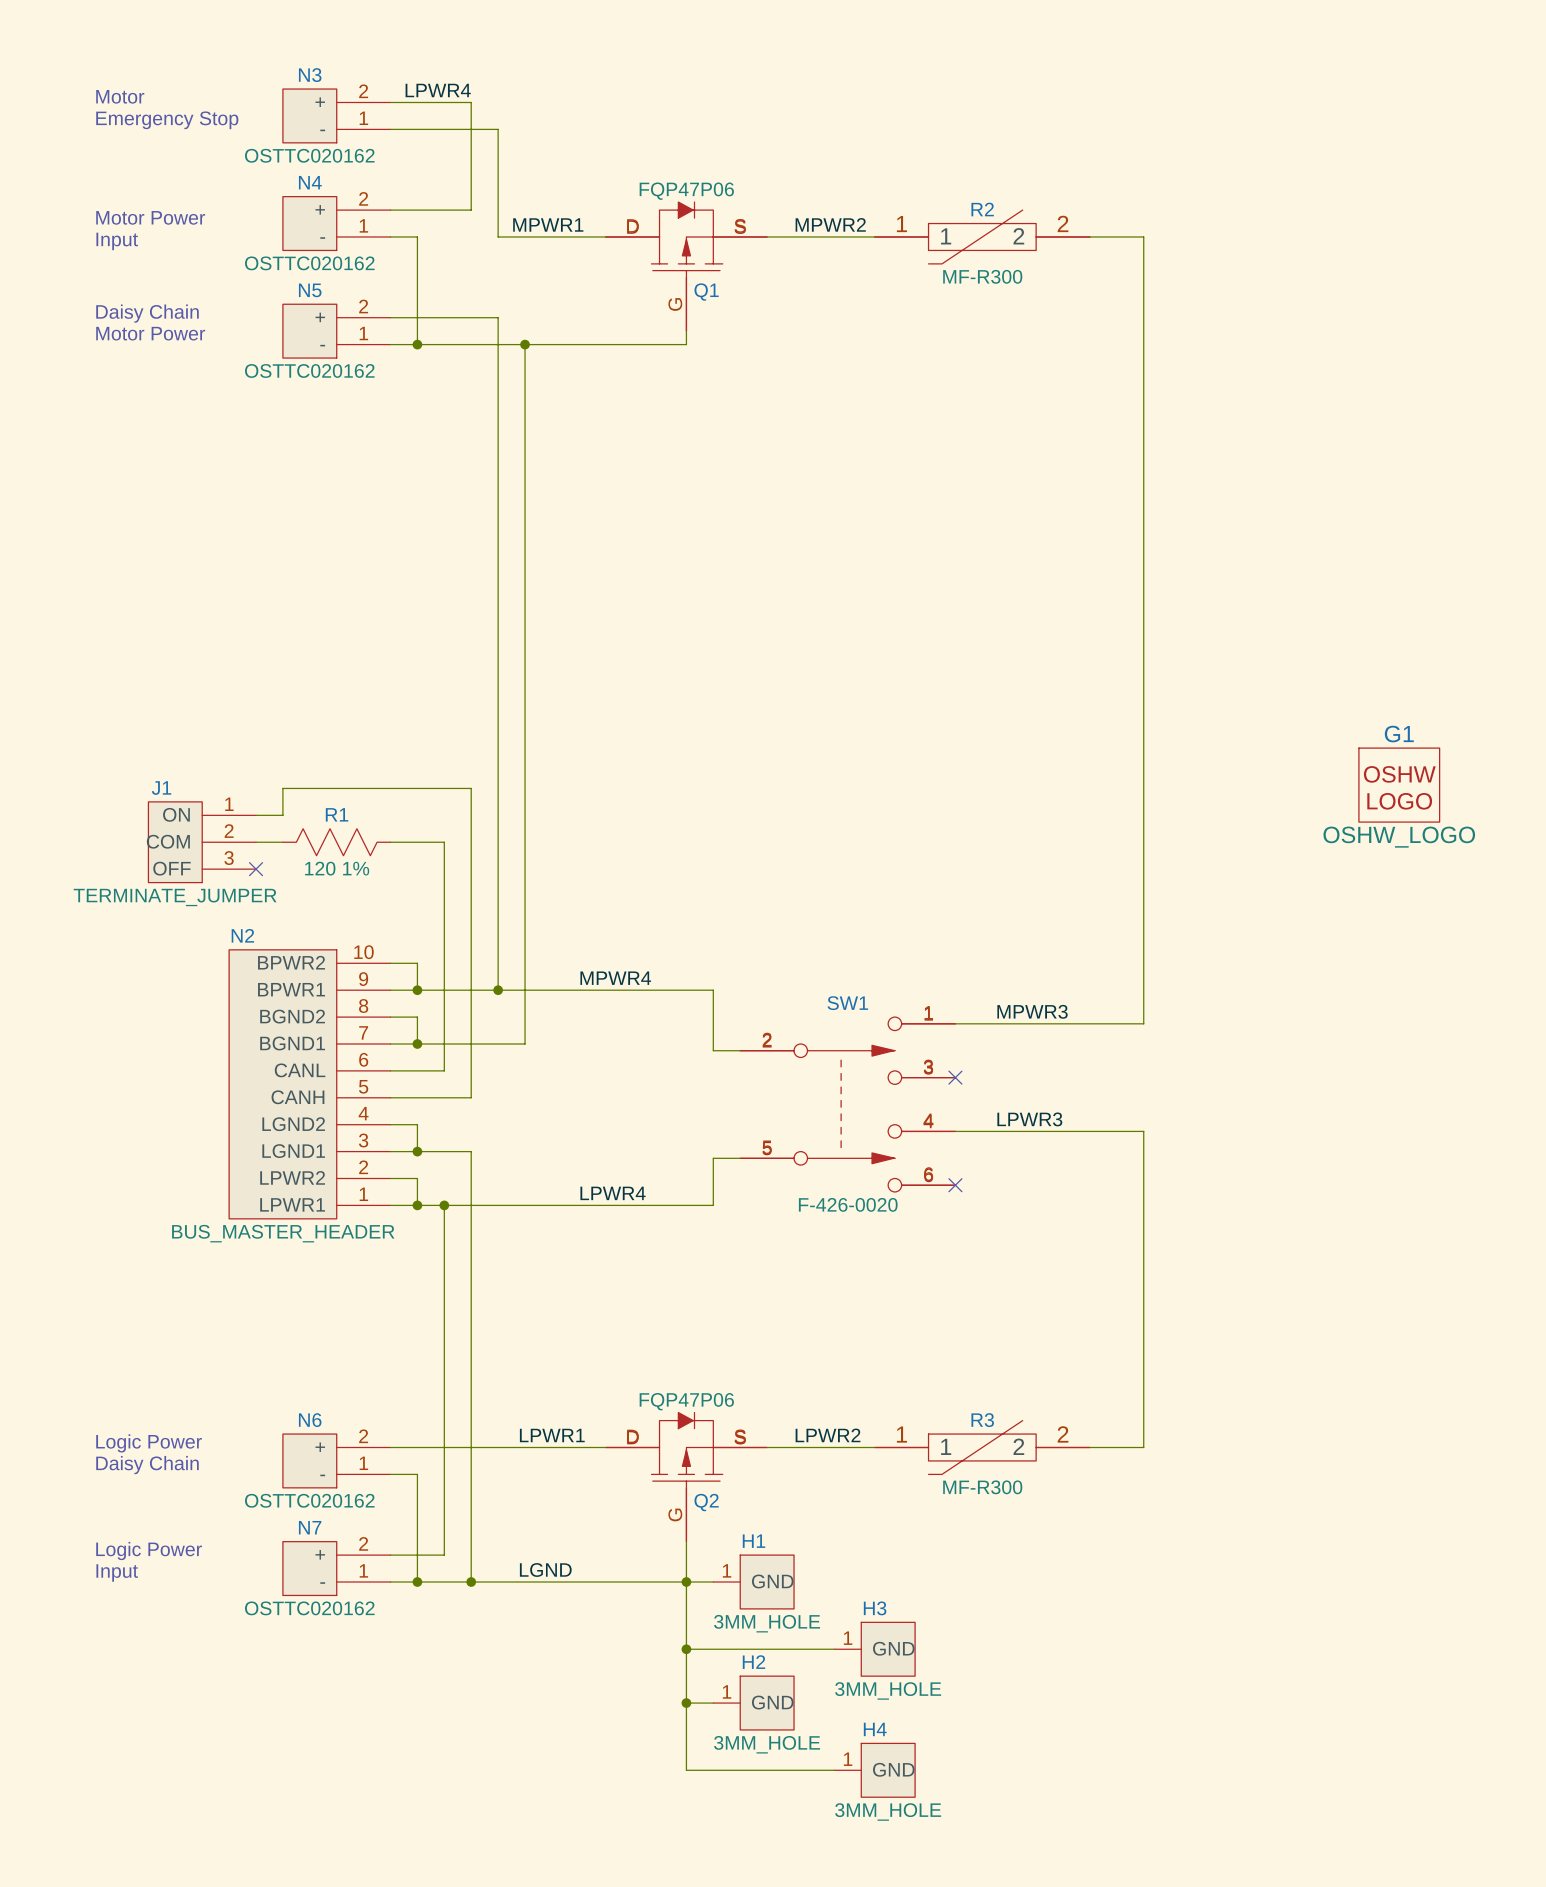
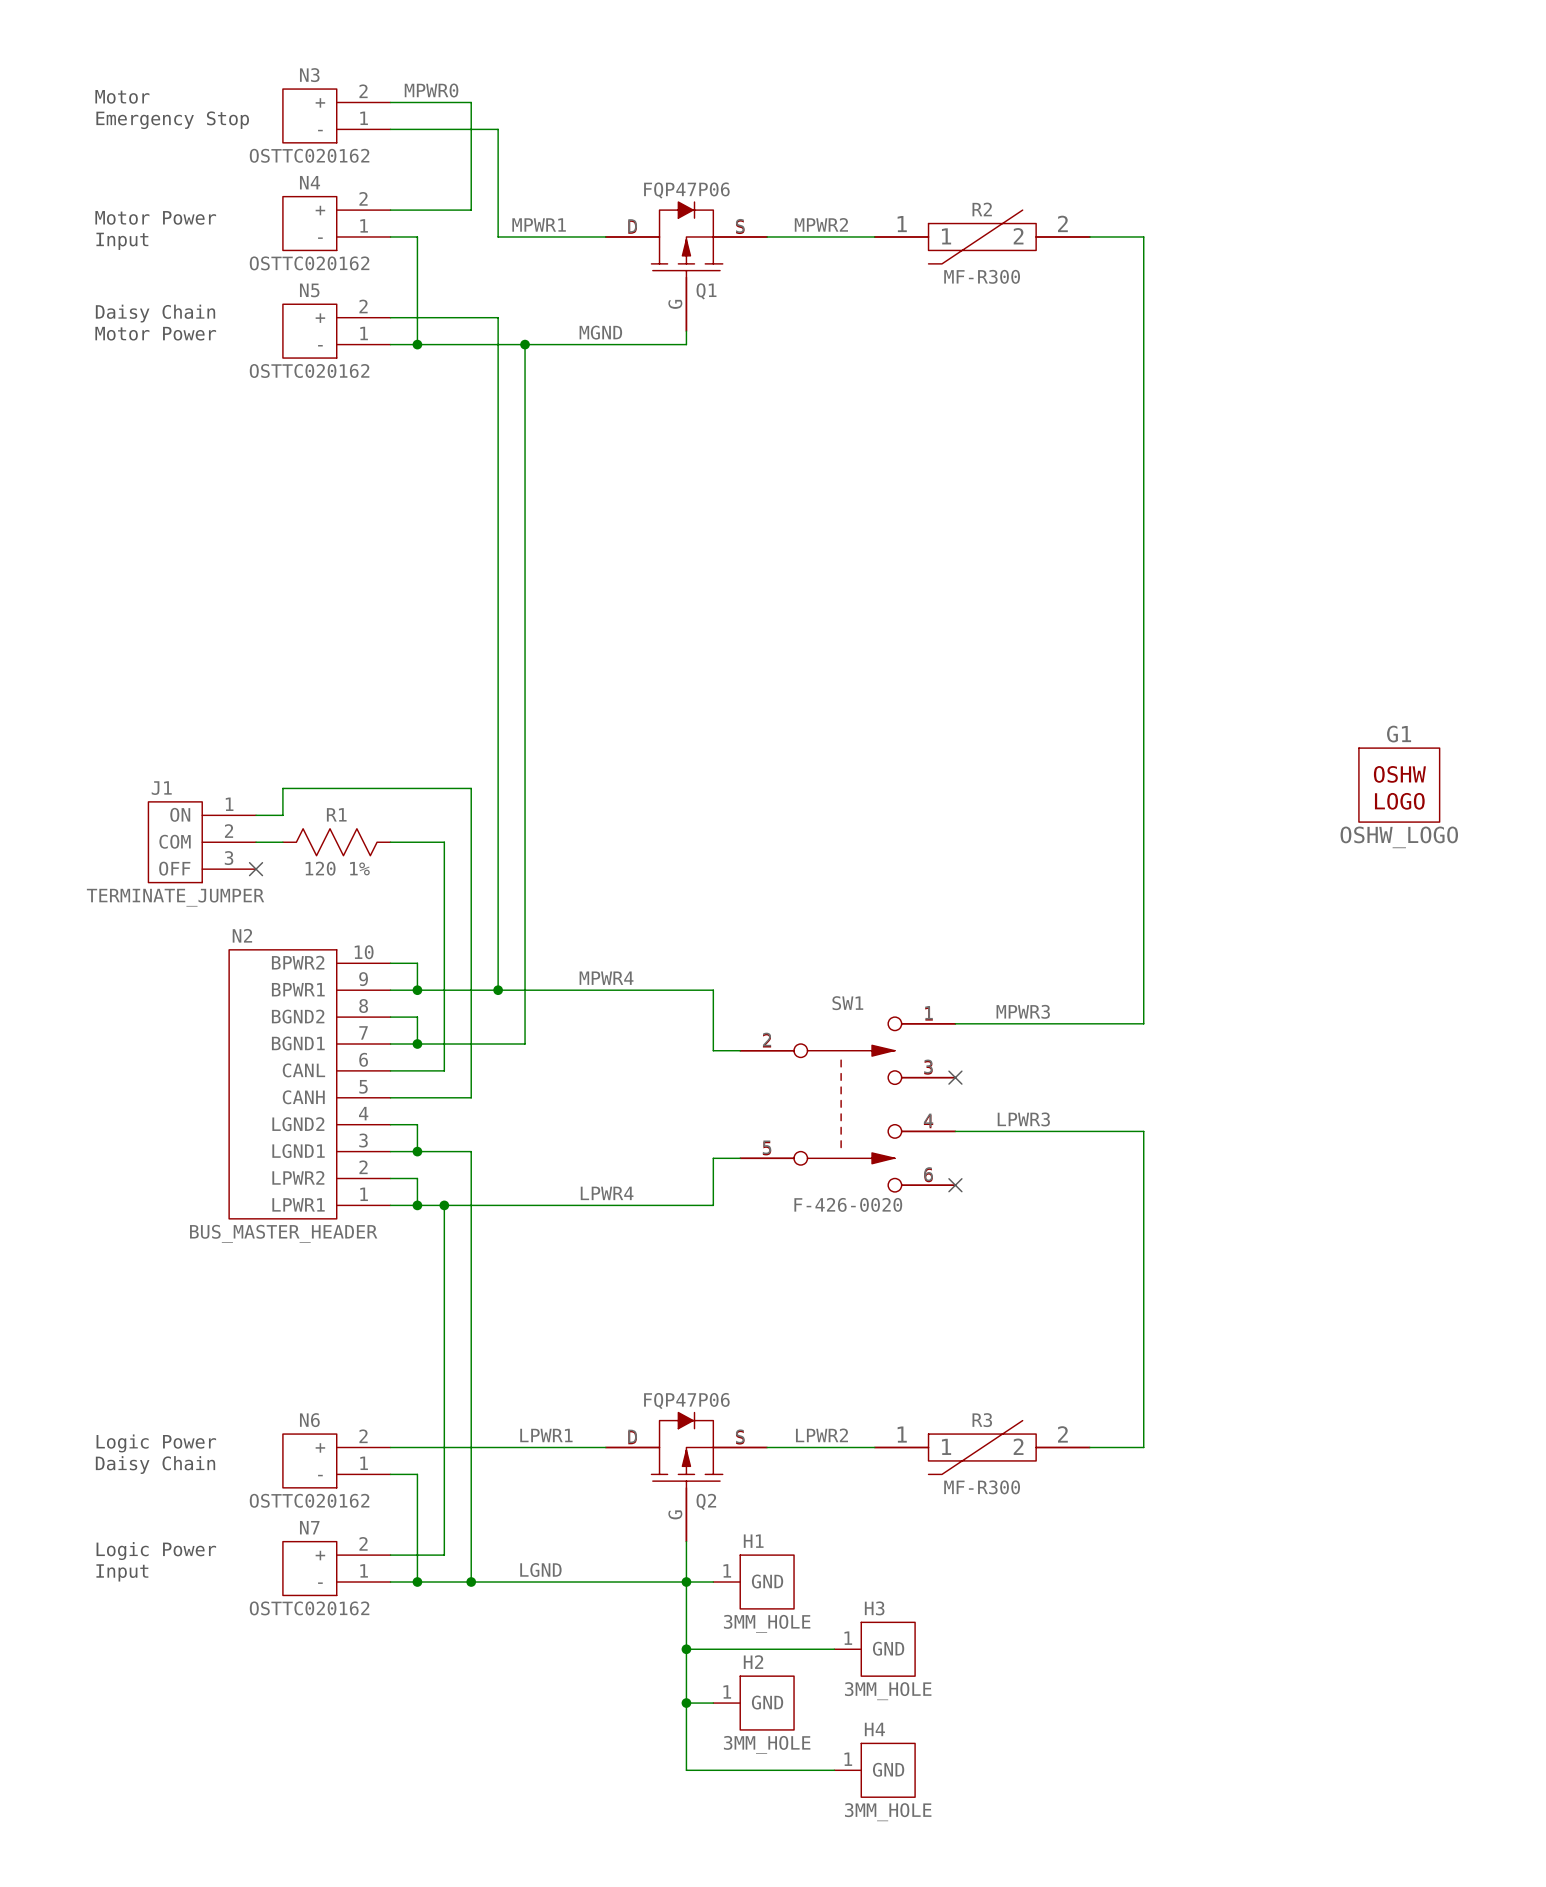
label: LPWR4 (438, 90) -> MPWR0 (431, 90)
label: none -> MGND (600, 332)

